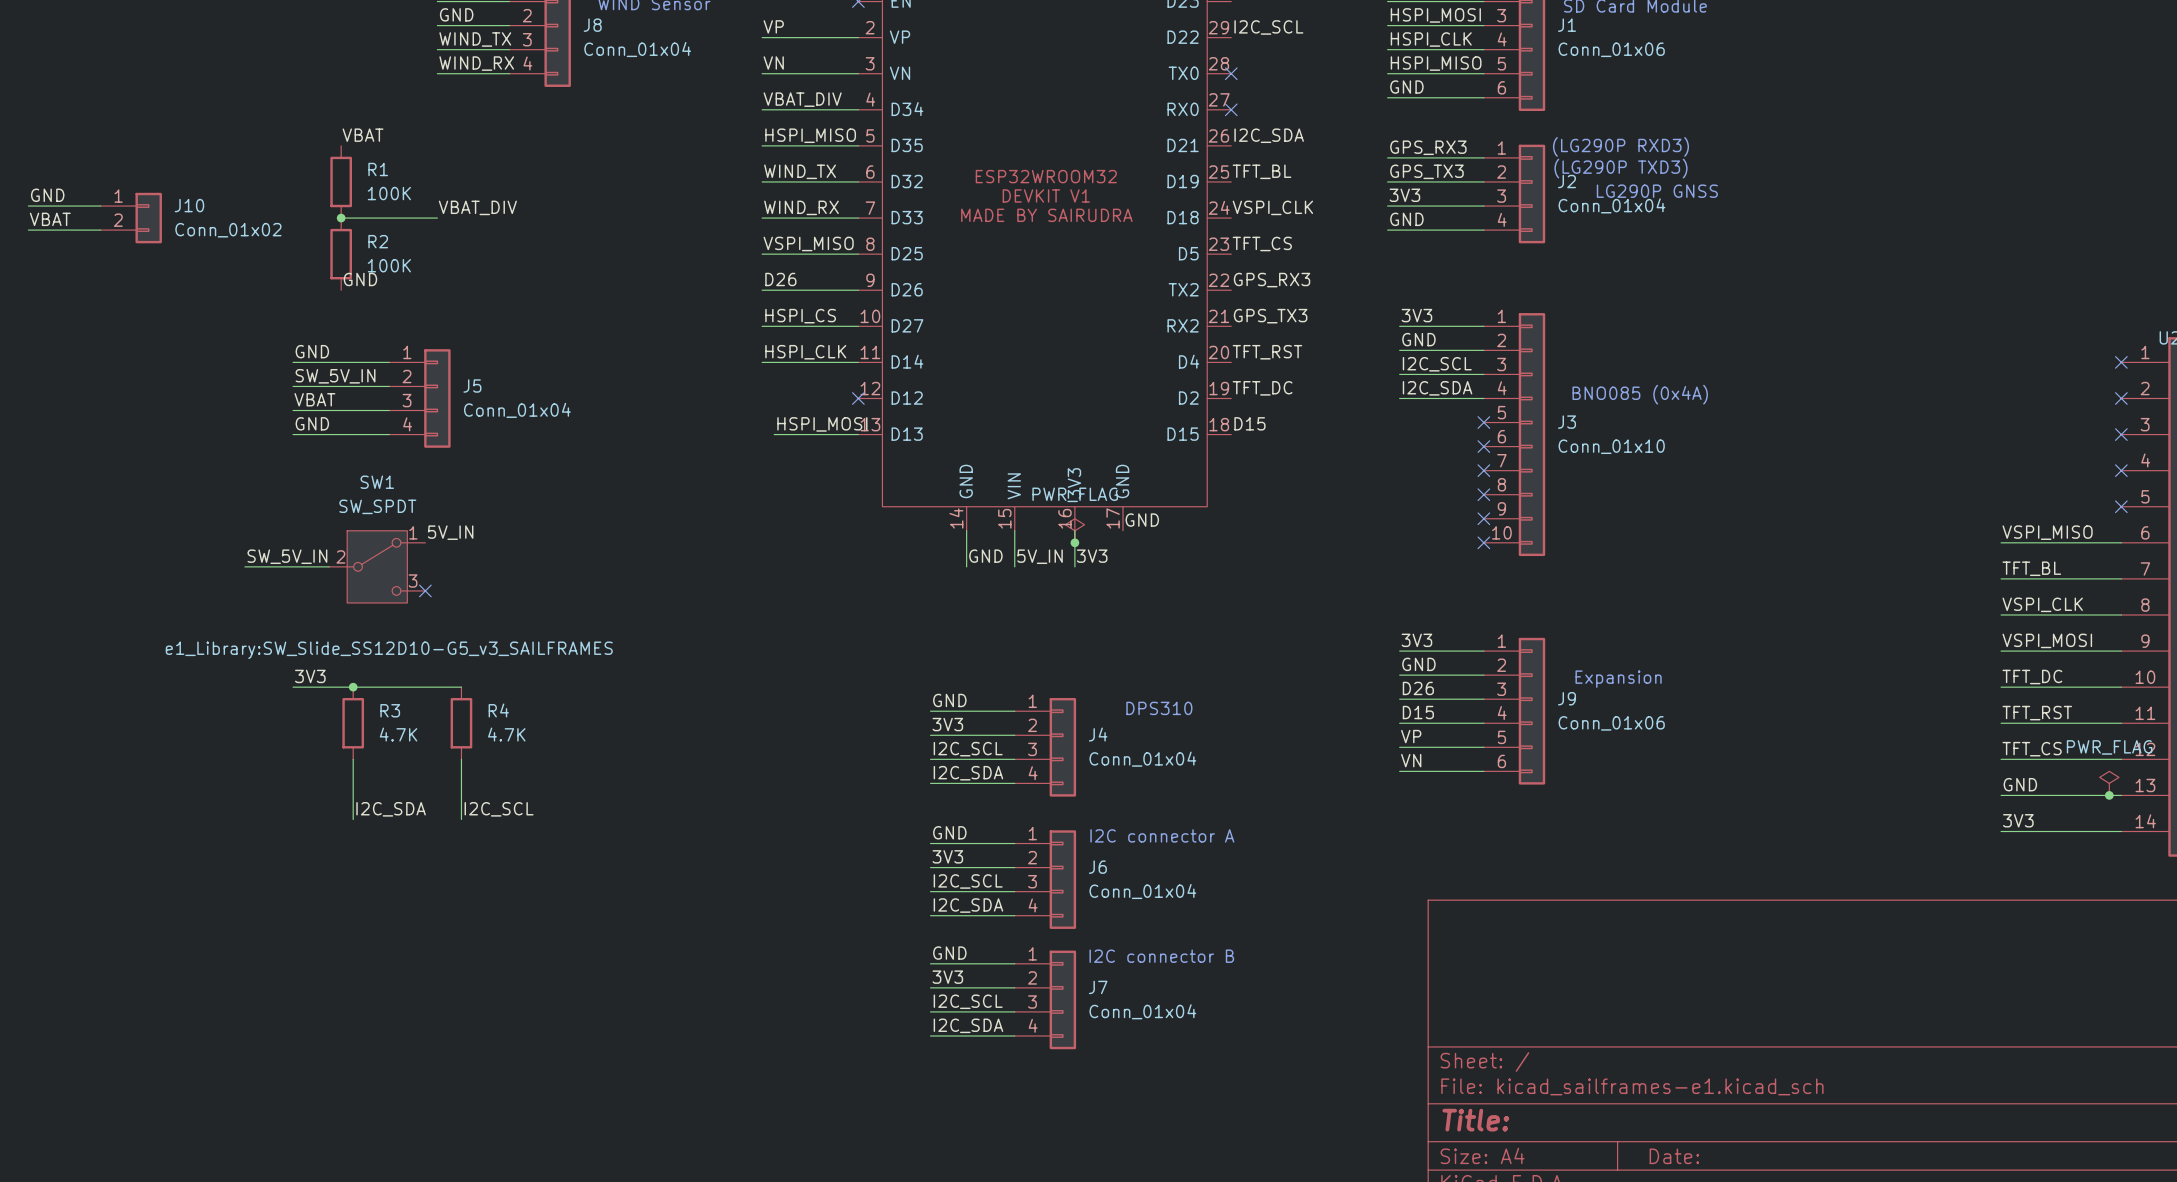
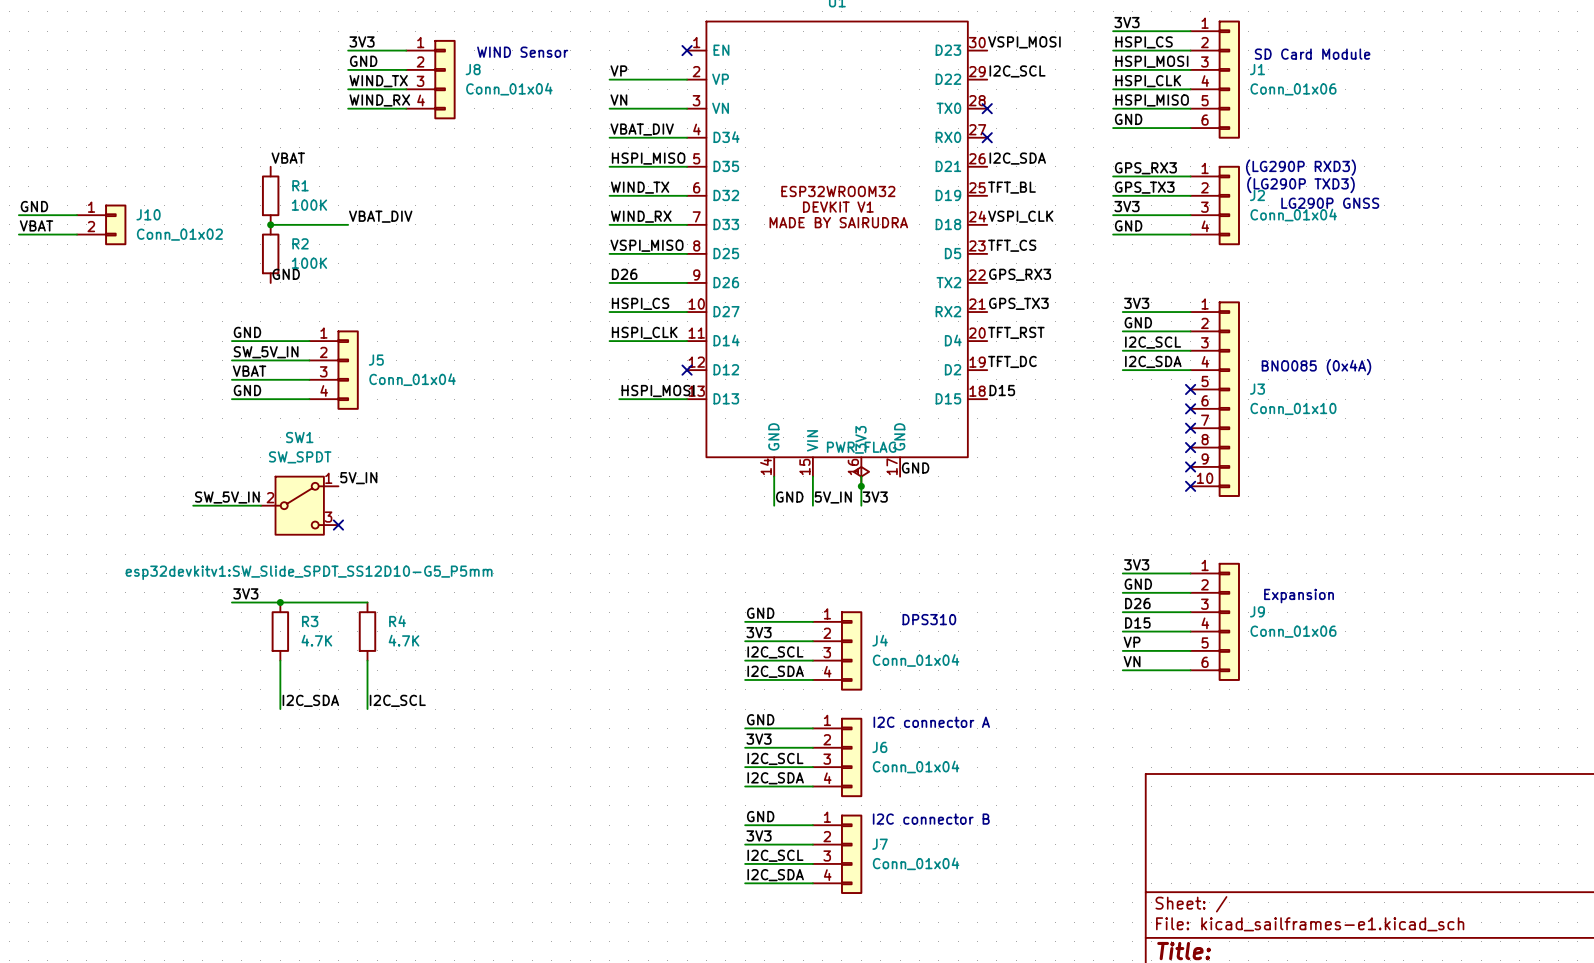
SW1 text: e1_Library:SW_Slide_SS12D10-G5_v3_SAILFRAMES (389, 650) -> esp32devkitv1:SW_Slide_SPDT_SS12D10-G5_P5mm (309, 572)

